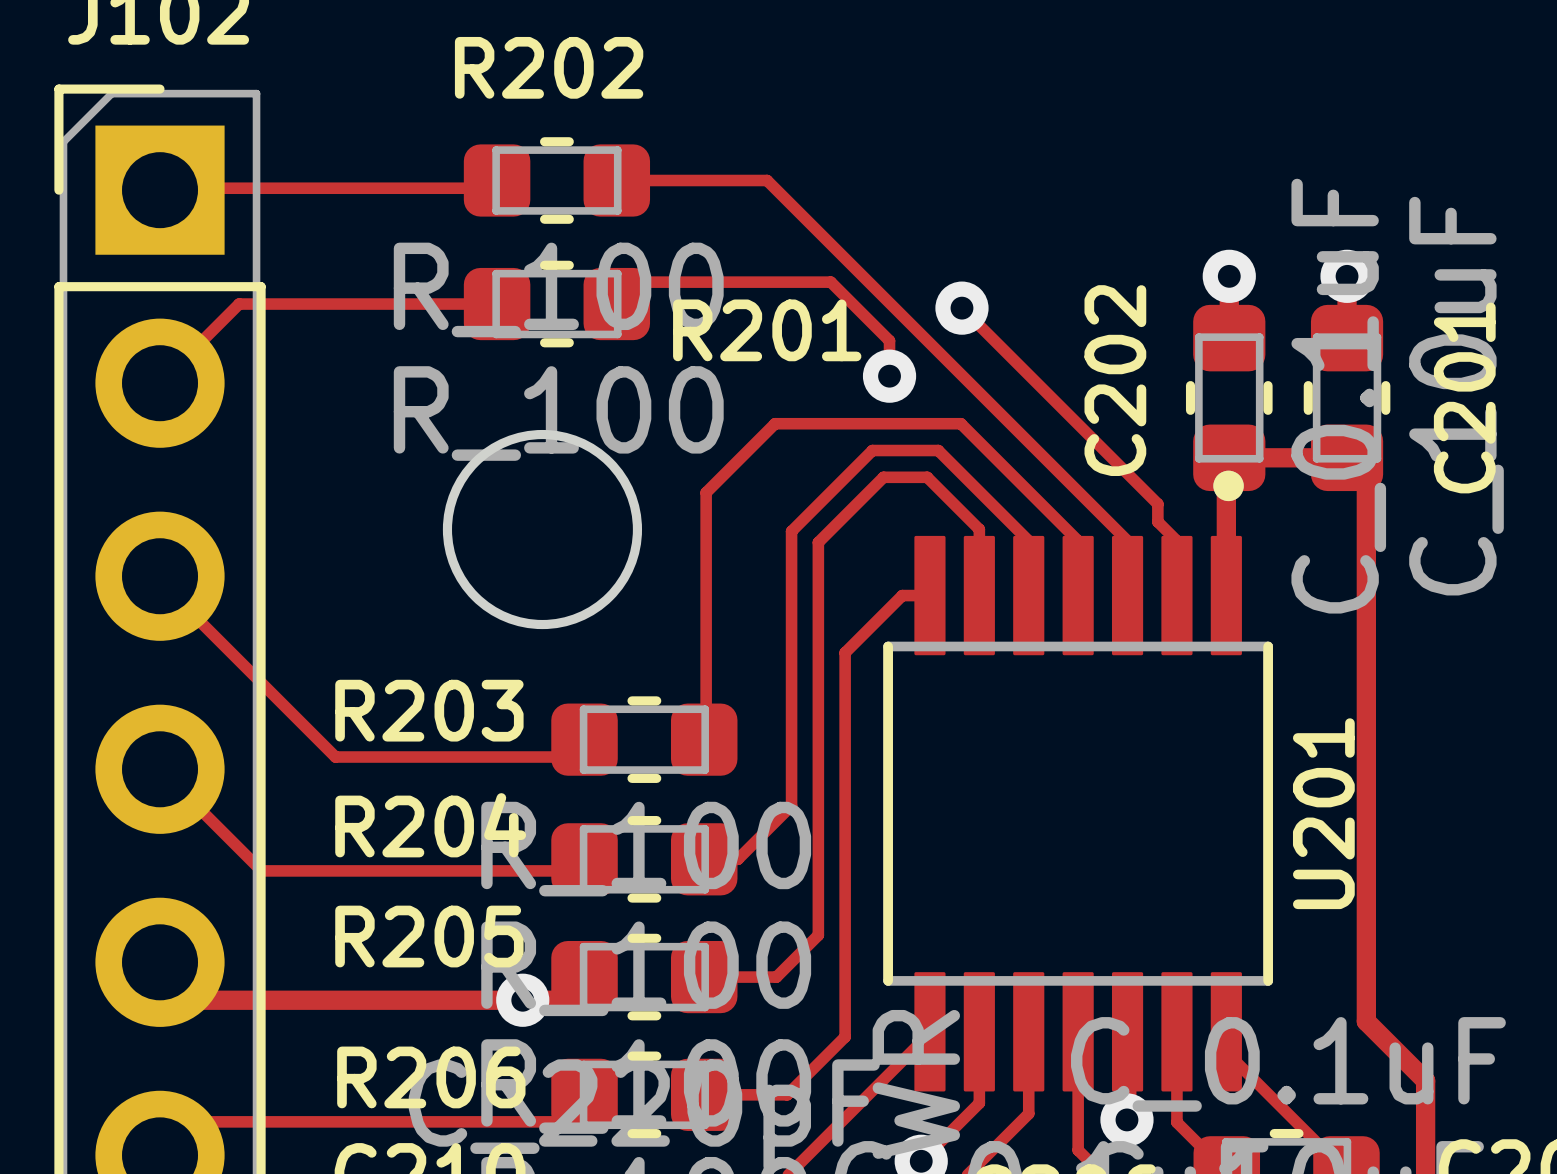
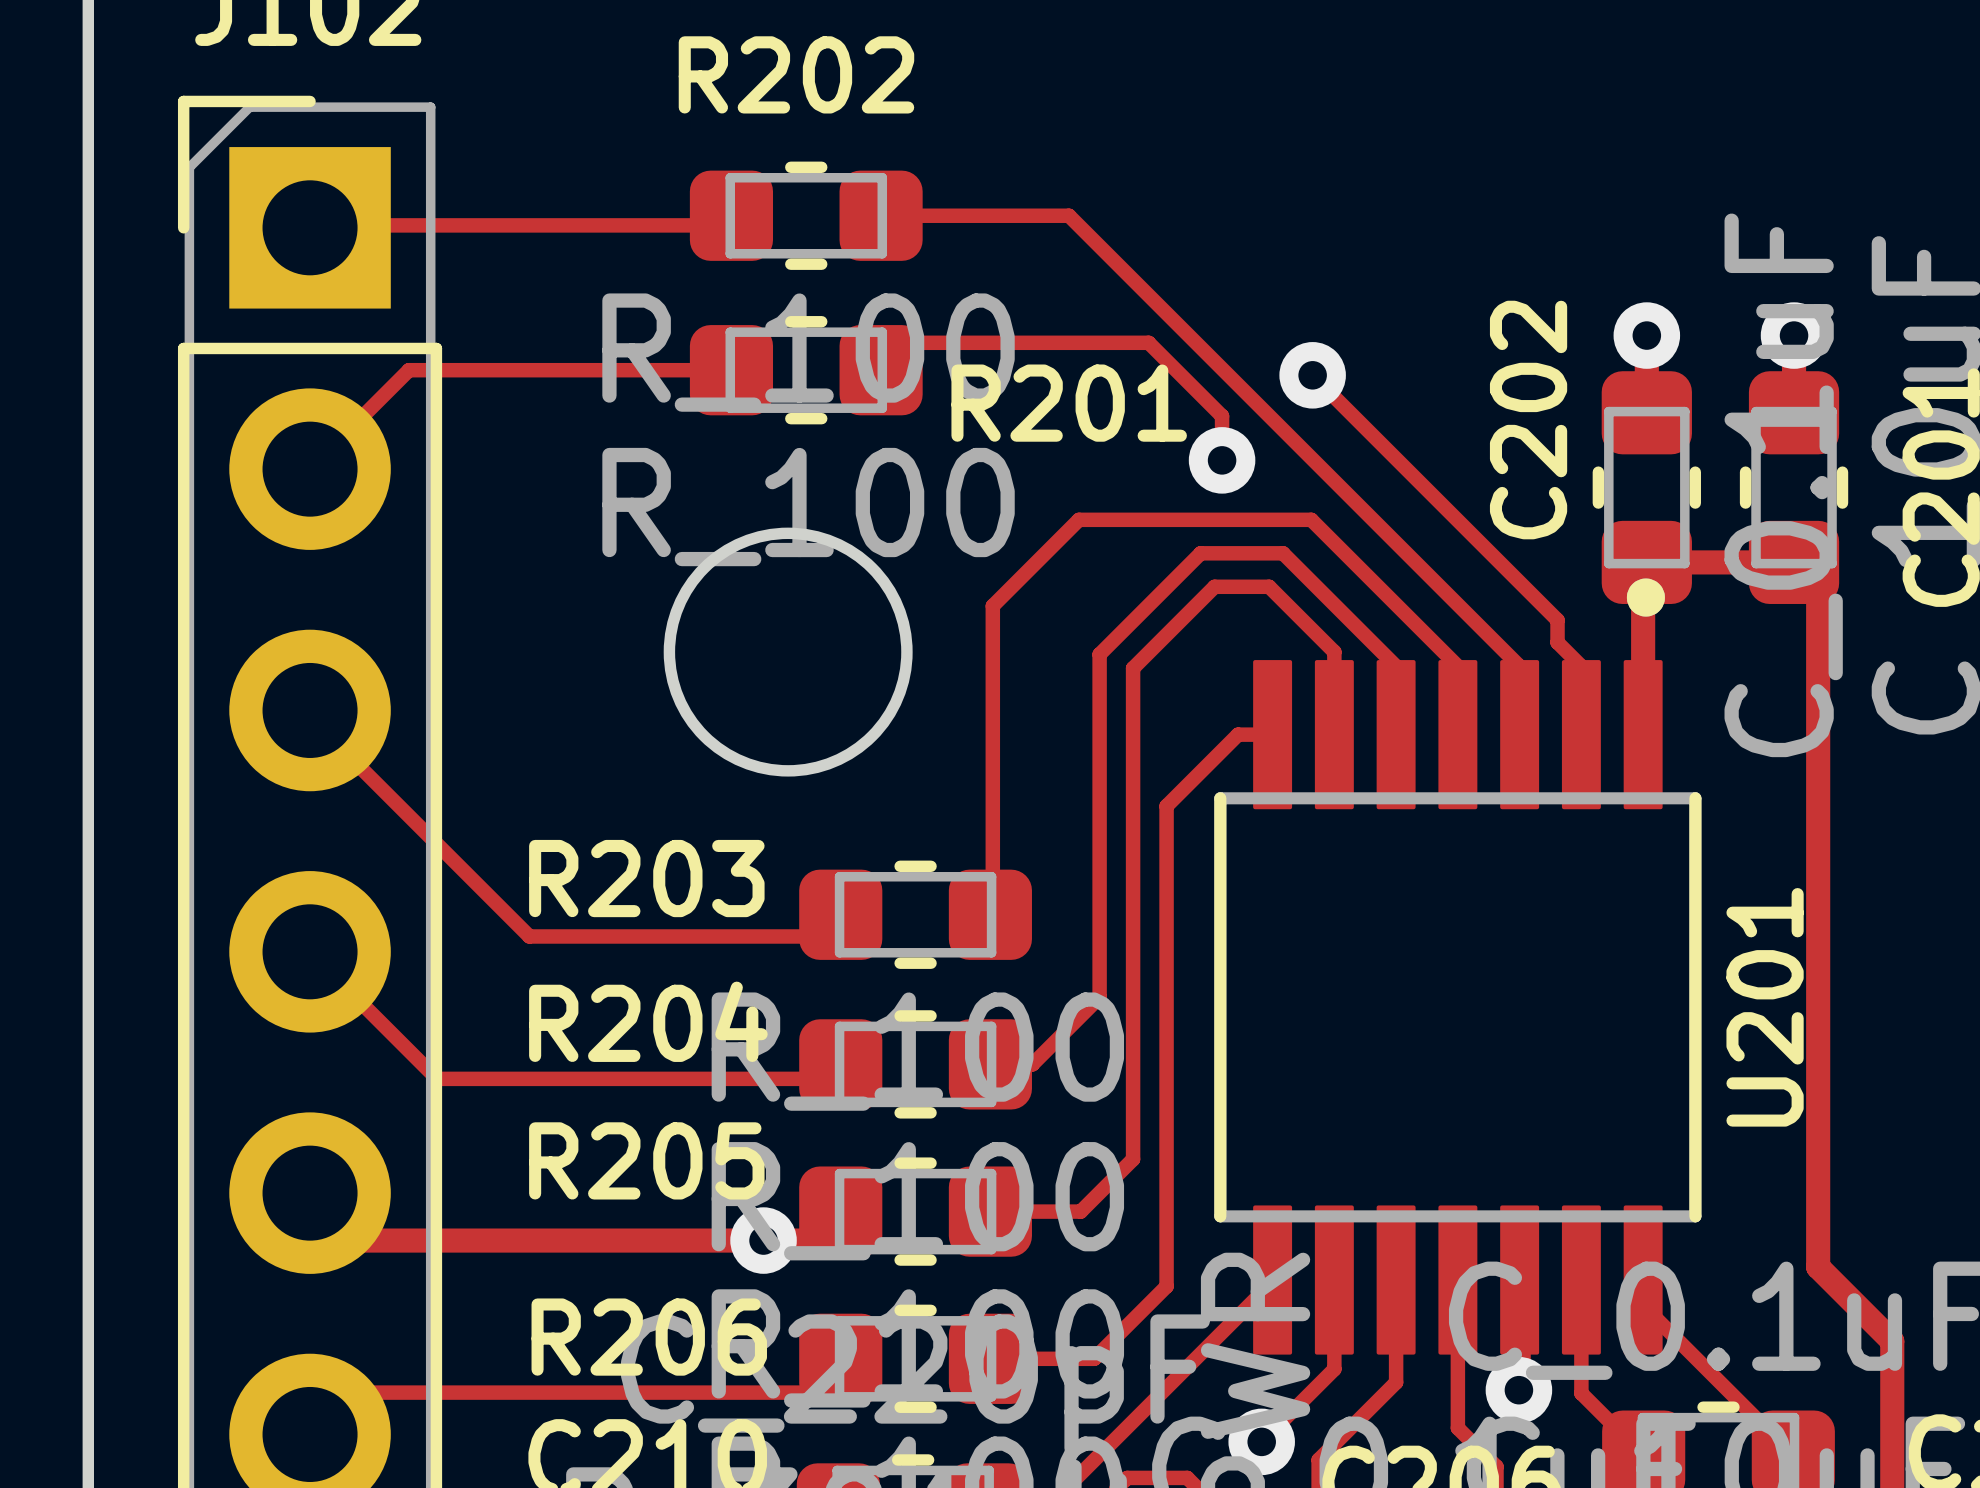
C202 name position: C202 (1115, 380) -> C202 (1528, 420)

